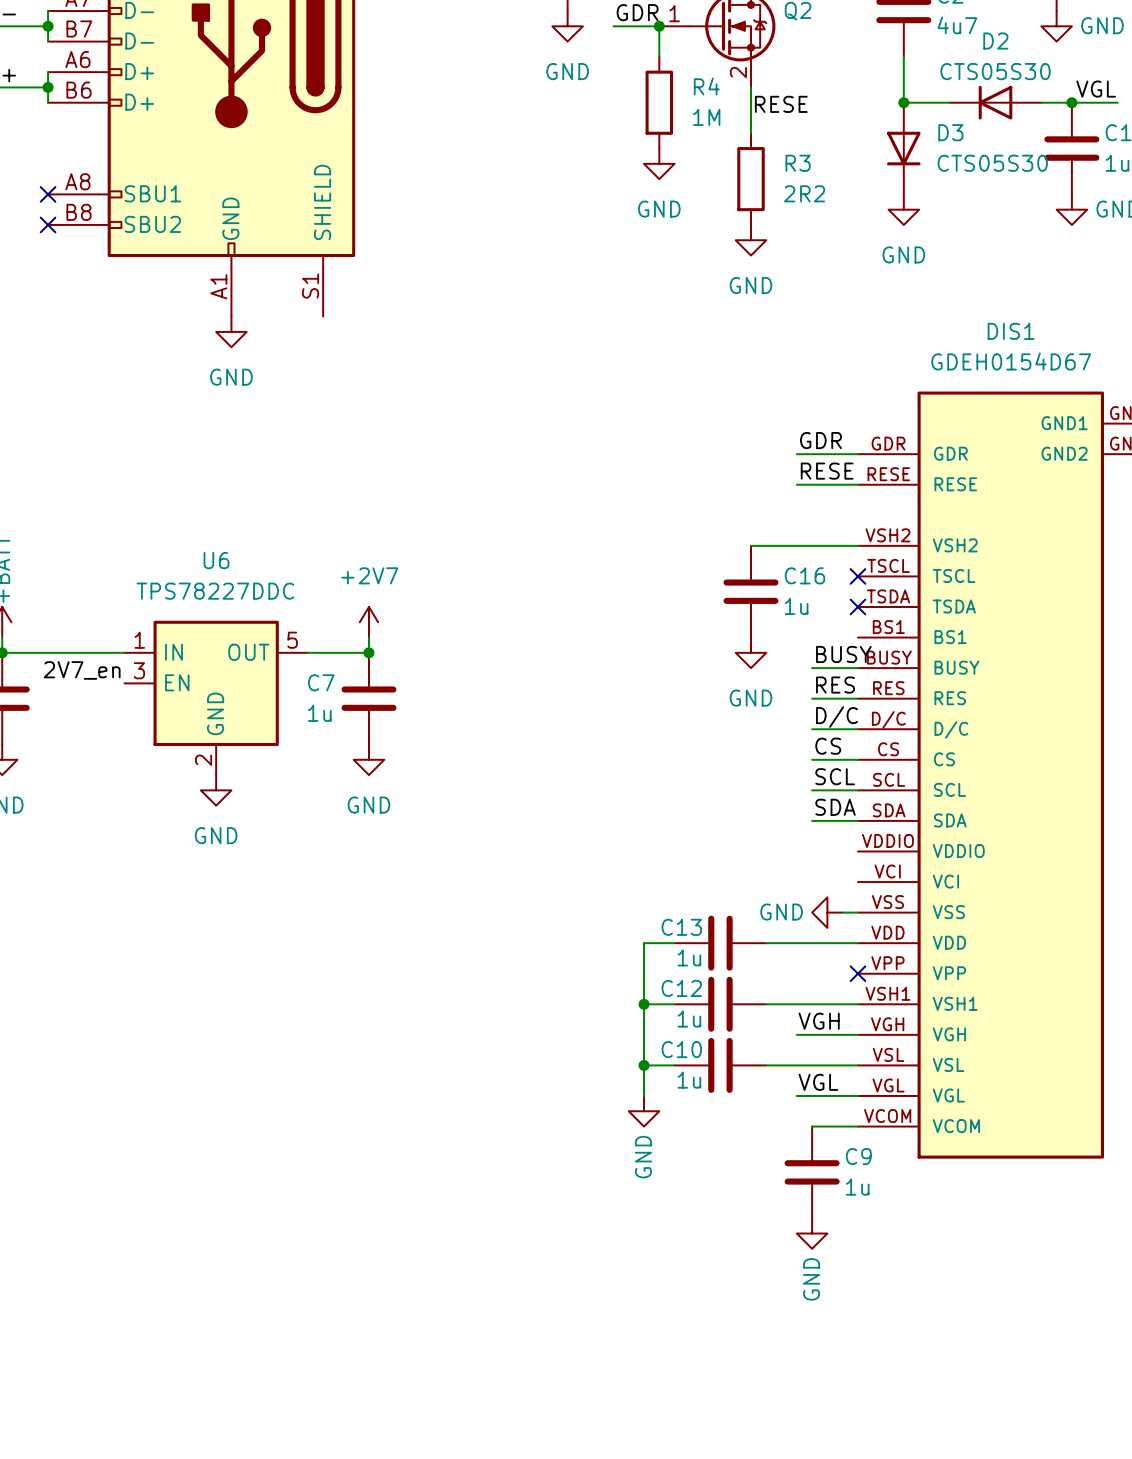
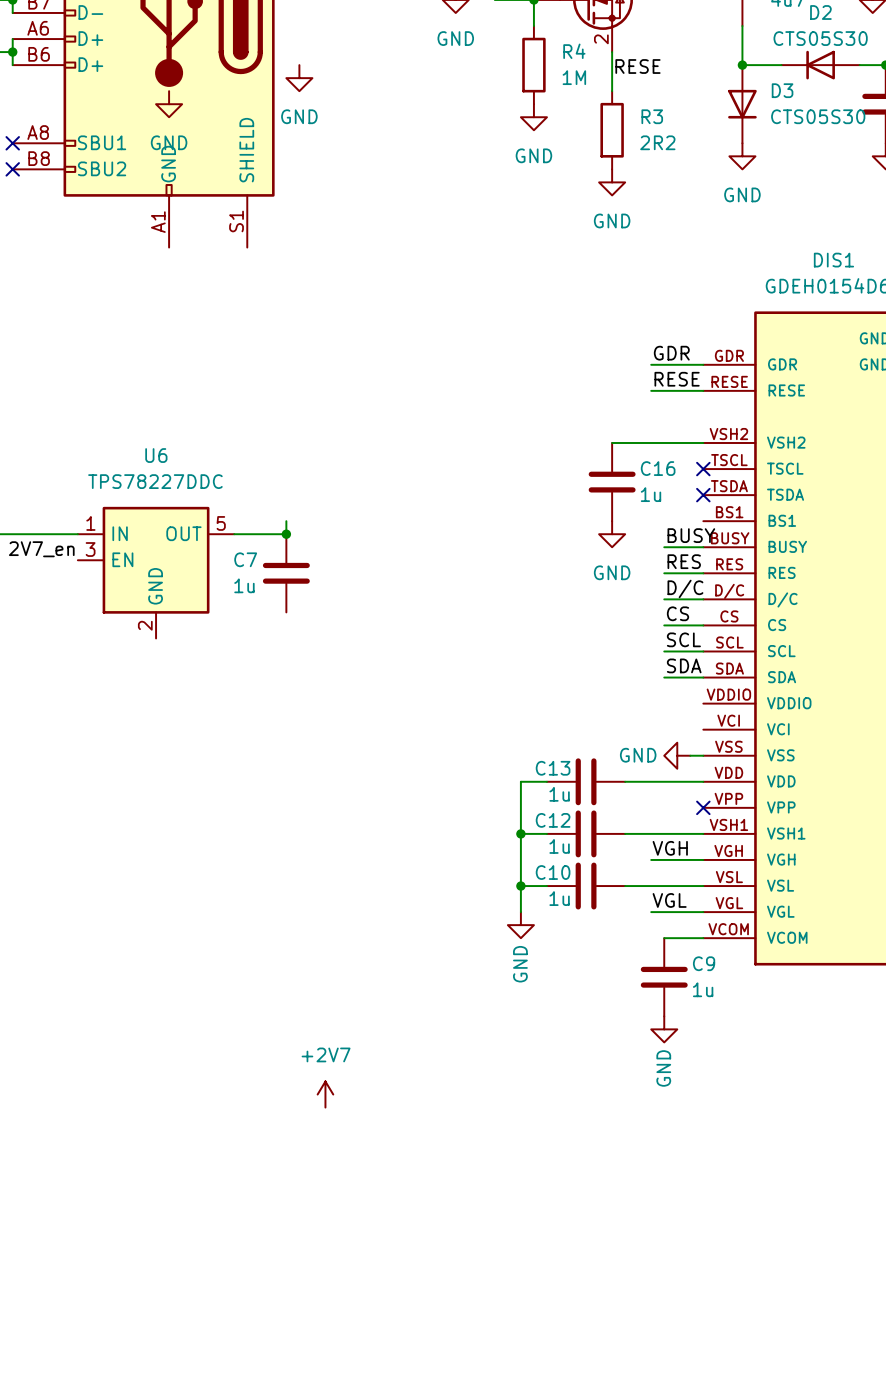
power symbol: none -> GND (299, 78)
power symbol: none -> GND (169, 104)
power symbol: GND (231, 331) -> none
power symbol: +2V7 (368, 622) -> none
power symbol: GND (368, 759) -> none
power symbol: GND (216, 790) -> none
power symbol: none -> +2V7 (325, 1094)

